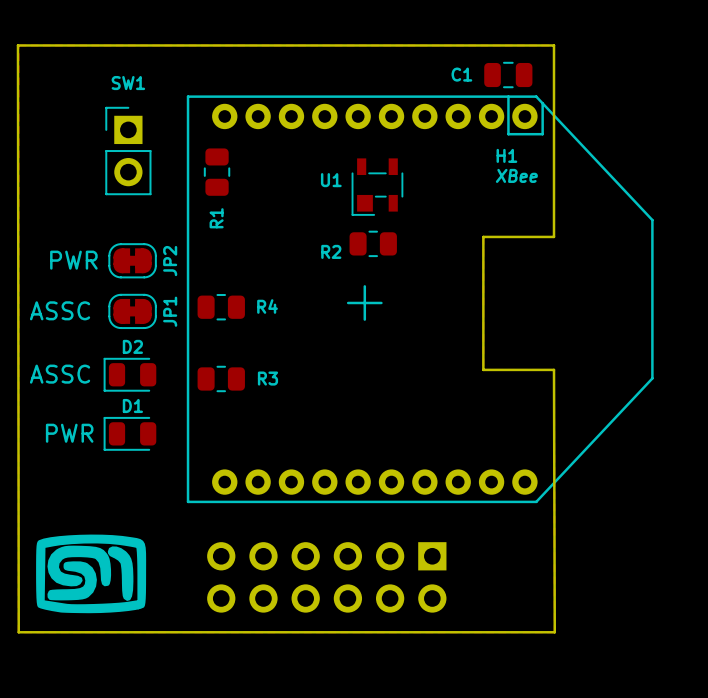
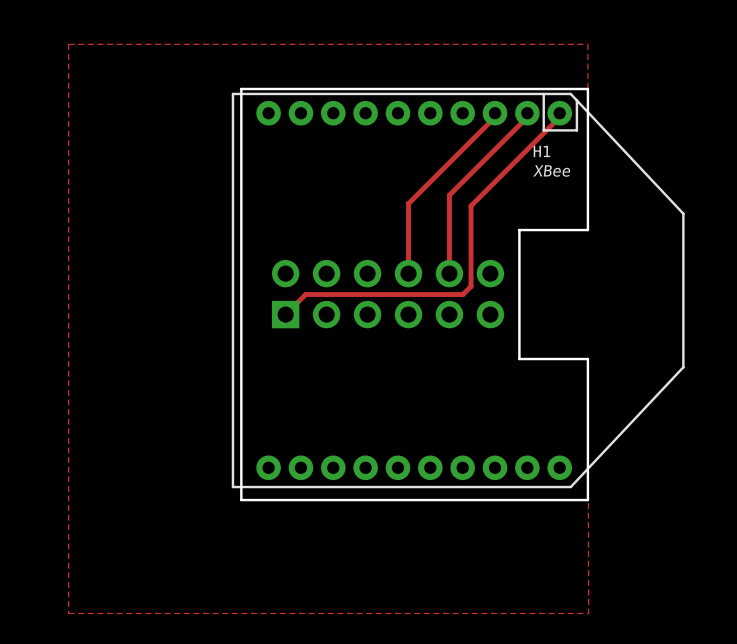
C1: (508, 75) -> none
board edge: (554, 91) (554, 45) (17, 45) (18, 632) (554, 632) (554, 369) -> (587, 89) (241, 89) (241, 500) (587, 500) (587, 359)
track: none -> (499, 113) (408, 203) (408, 273)
track: none -> (531, 113) (449, 195) (449, 273)
track: none -> (563, 113) (471, 205) (471, 286) (462, 294) (305, 294) (285, 314)
SW1: (128, 151) -> none
R1: (217, 172) -> none
U1: (377, 187) -> none
R2: (373, 243) -> none
text: PWR (73, 260) -> none
JP2: (132, 260) -> none
drawing: [346, 285, 383, 321] -> none
R4: (221, 307) -> none
text: ASSC (60, 310) -> none
JP1: (132, 311) -> none
text: ASSC (60, 374) -> none
D2: (129, 374) -> none
R3: (221, 378) -> none
text: PWR (69, 433) -> none
D1: (129, 433) -> none
drawing: [36, 534, 147, 614] -> none
part rotation: 0° (326, 577) -> 180° (388, 294)
part position: (326, 577) -> (388, 294)

